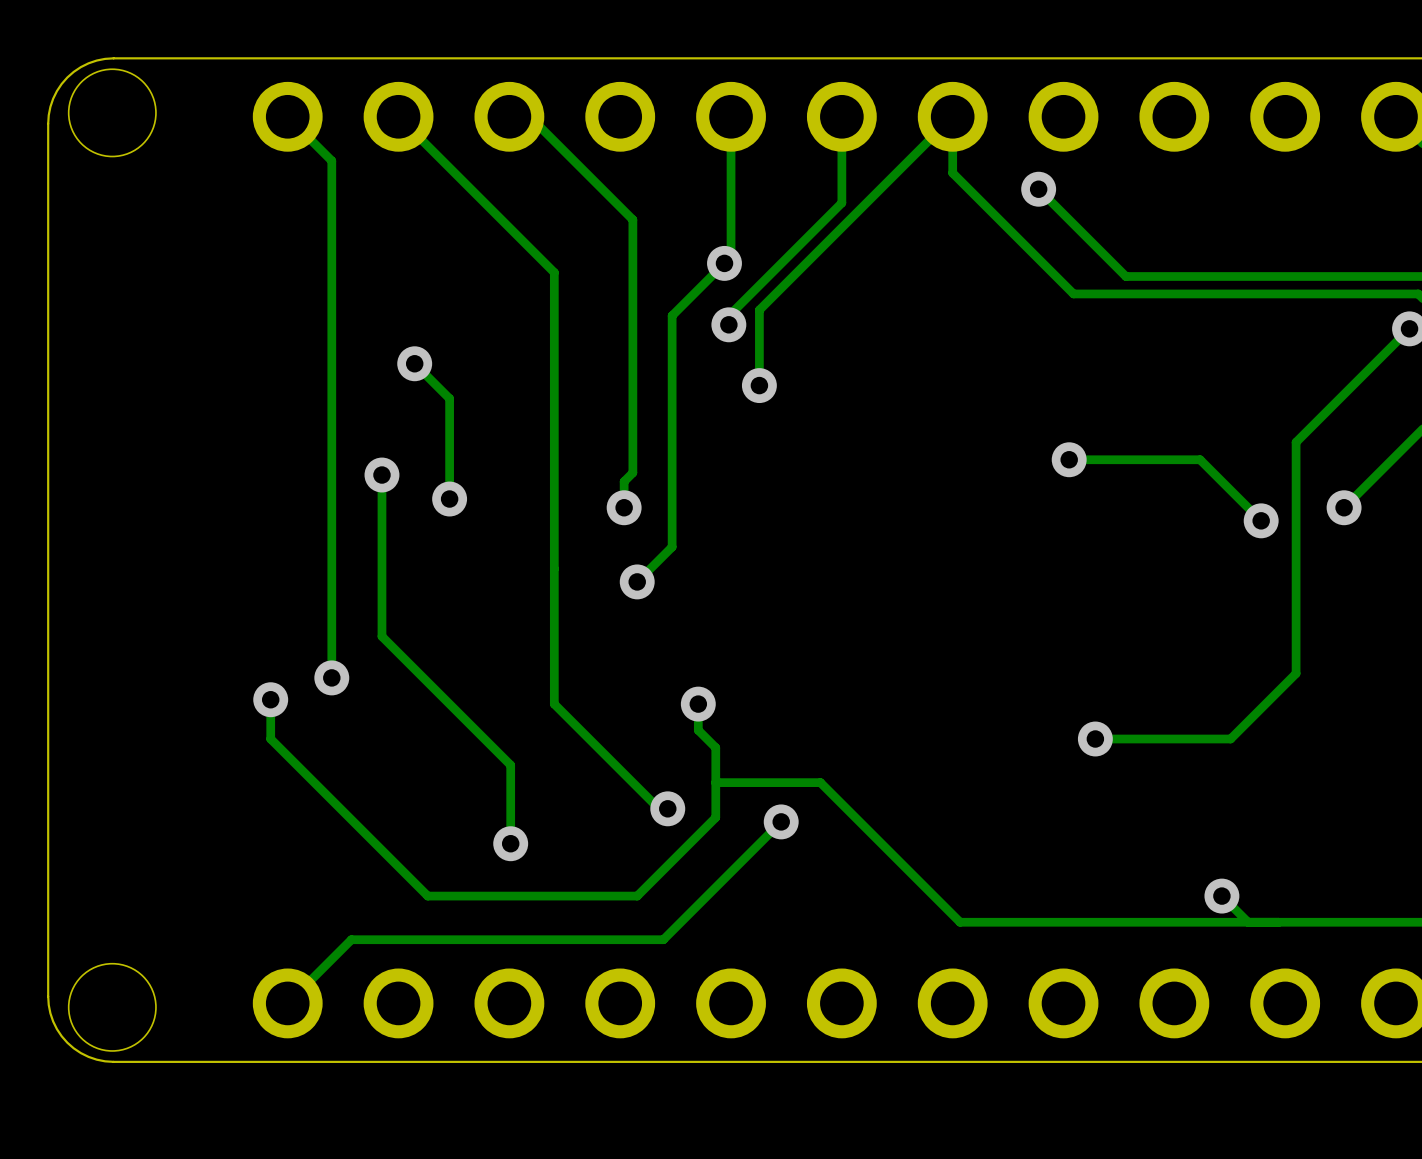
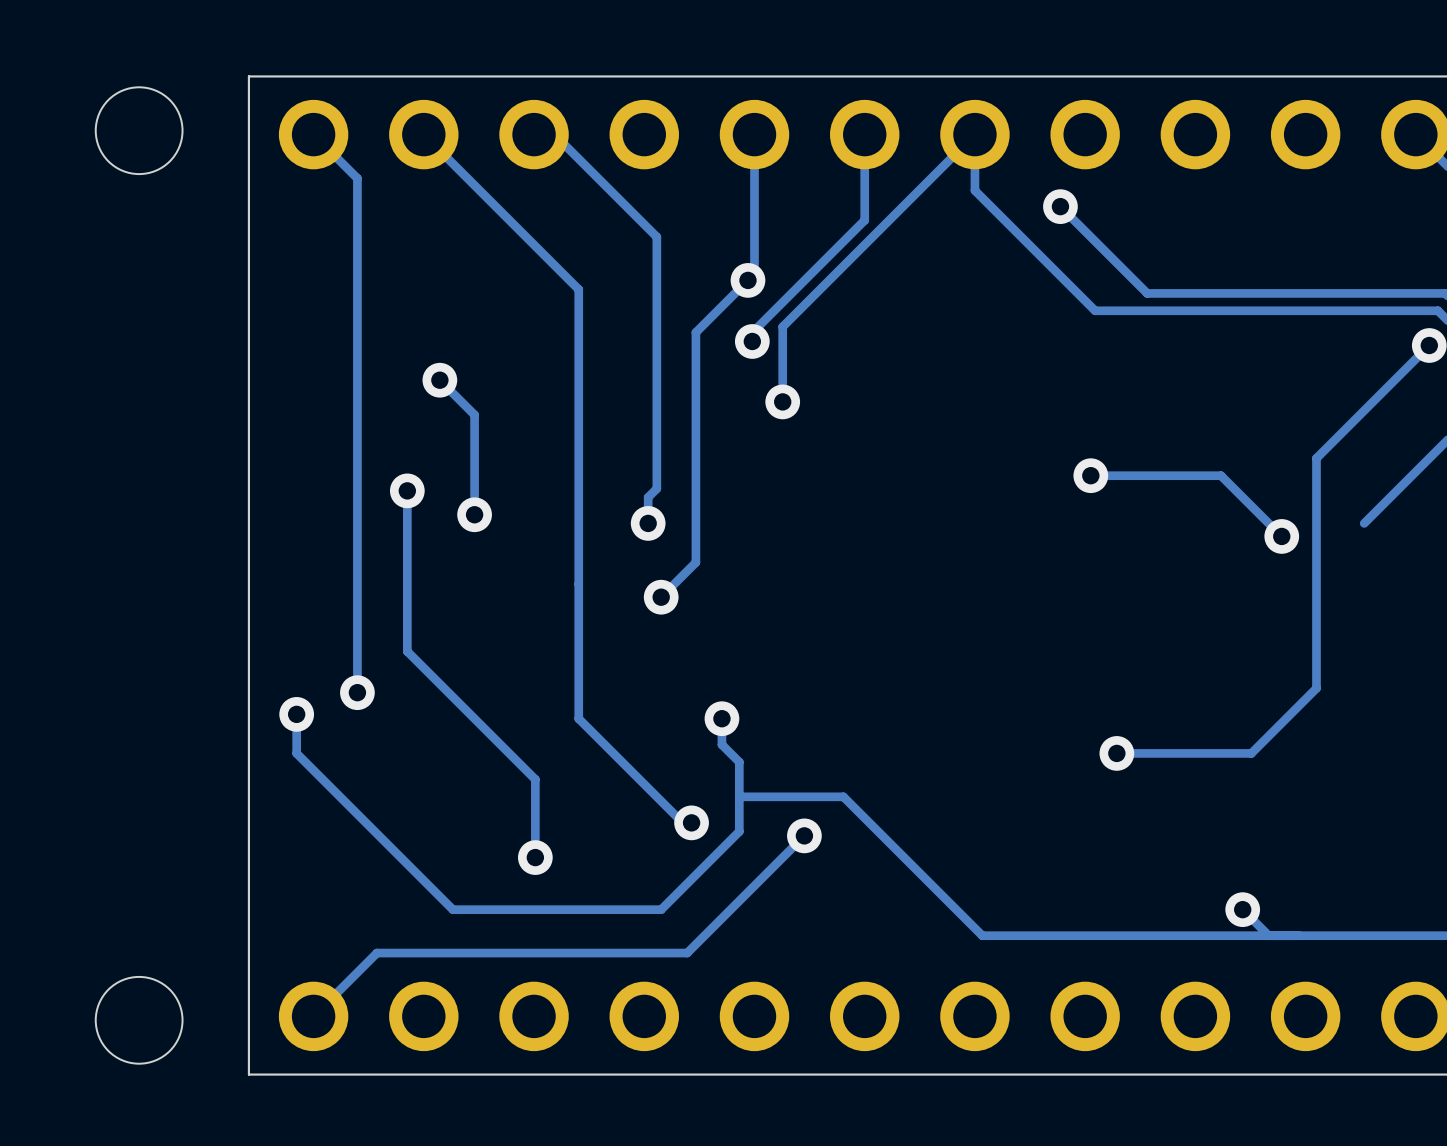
board edge: (222, 58) (113, 58) (88, 63) (73, 71) (61, 83) (53, 98) (48, 123) (48, 1004) (53, 1021) (61, 1036) (73, 1048) (96, 1059) (113, 1061) (222, 1061) -> (248, 76) (248, 1074)
via: (1344, 507) -> none

